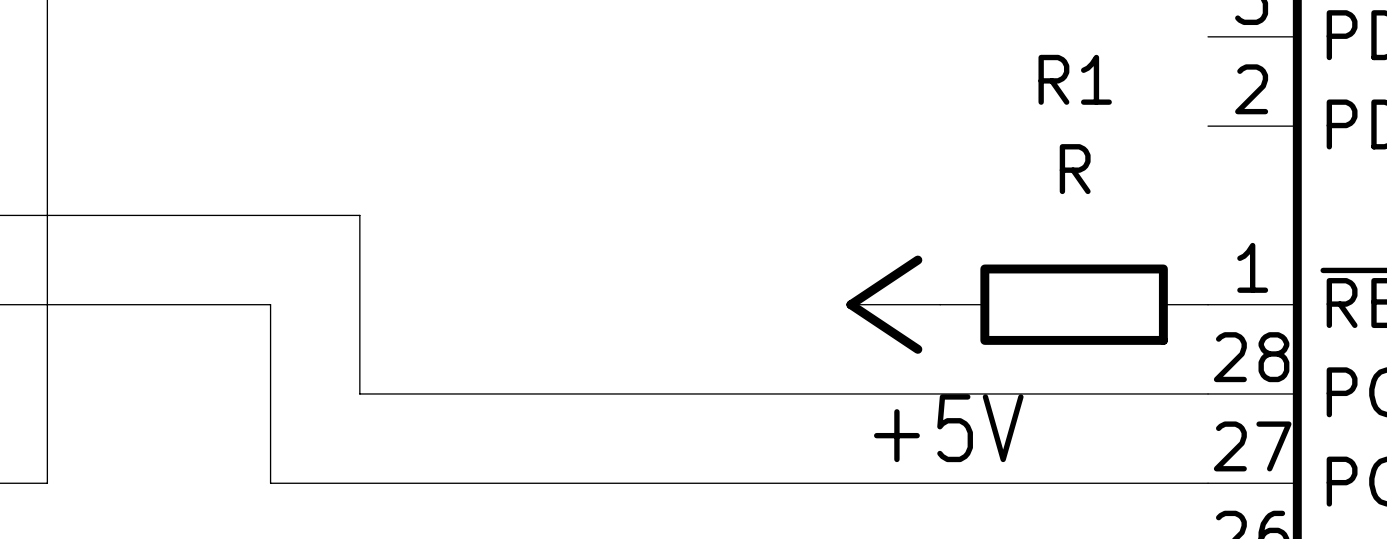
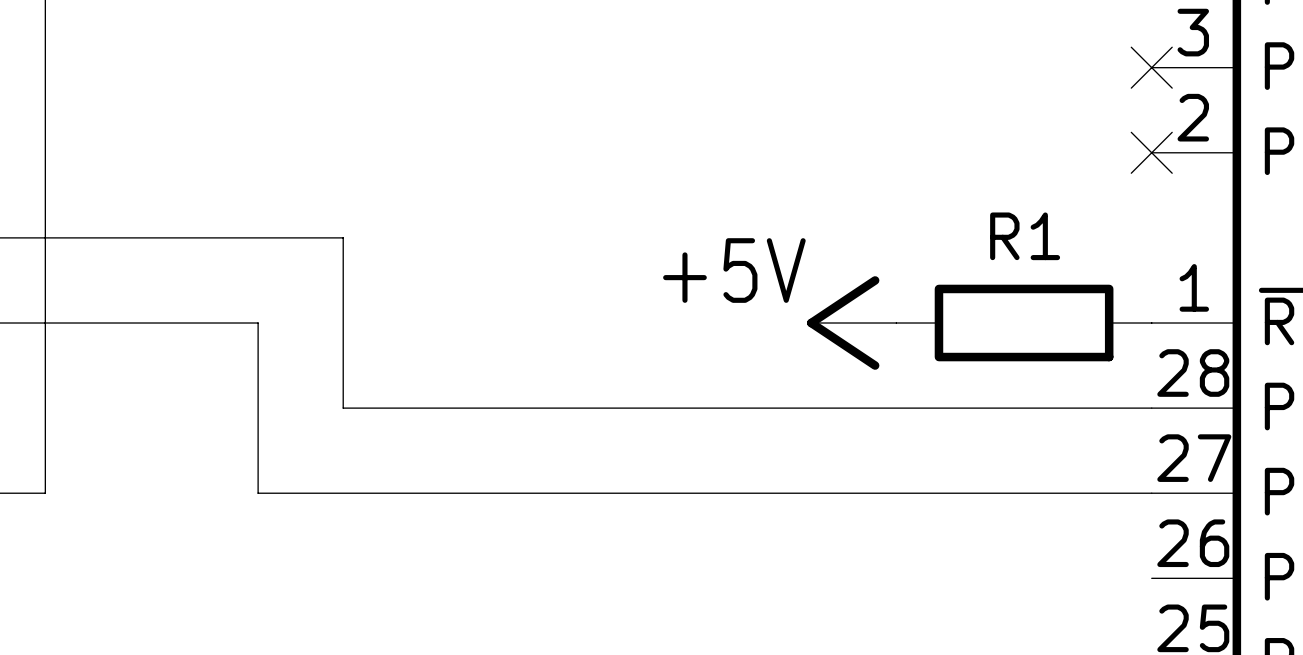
no-connect mark: none -> (1151, 67)
R1 name position: R1 (1075, 79) -> R1 (1025, 236)
no-connect mark: none -> (1151, 152)
R1 value: R (1075, 169) -> none
power symbol text position: +5V (948, 428) -> +5V (734, 270)

